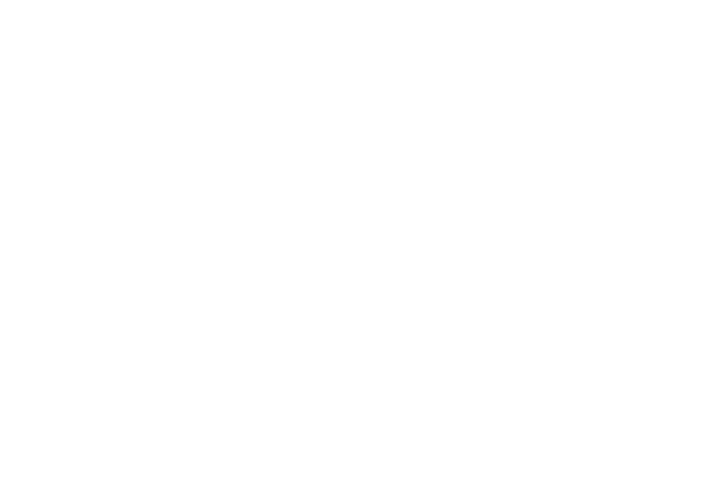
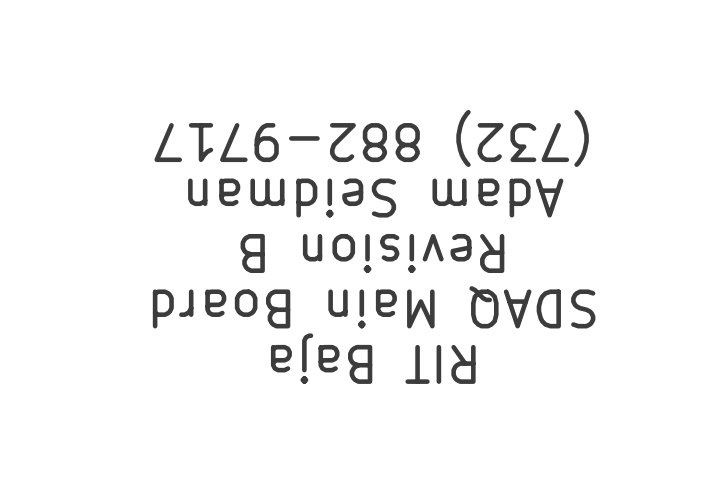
text: none -> (732) 882-9717 (371, 138)
text: none -> Adam Seidman (375, 198)
text: none -> Revision B (372, 253)
text: none -> SDAQ Main Board (374, 307)
text: none -> RIT Baja (373, 358)

